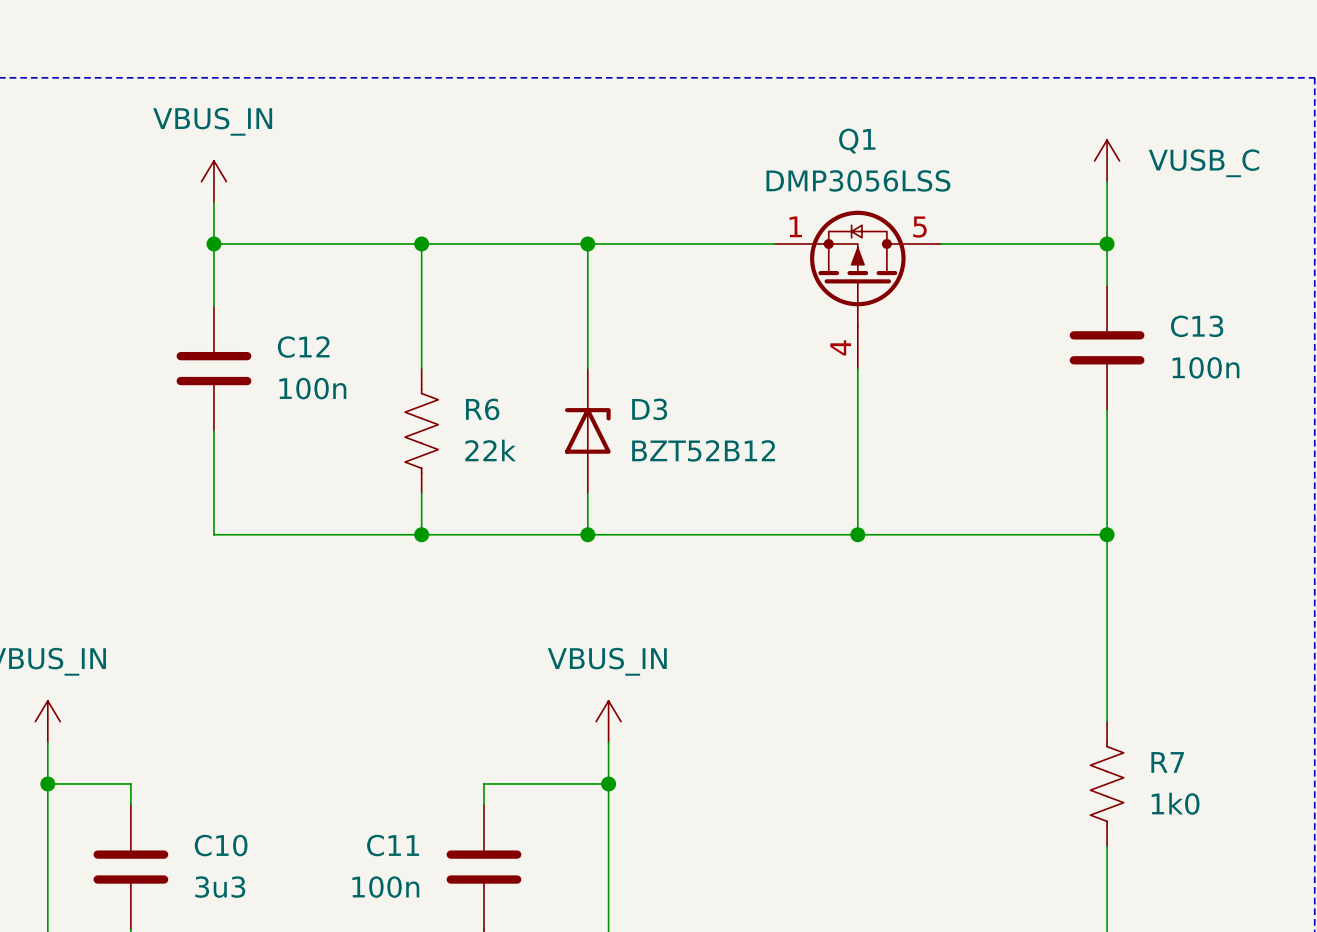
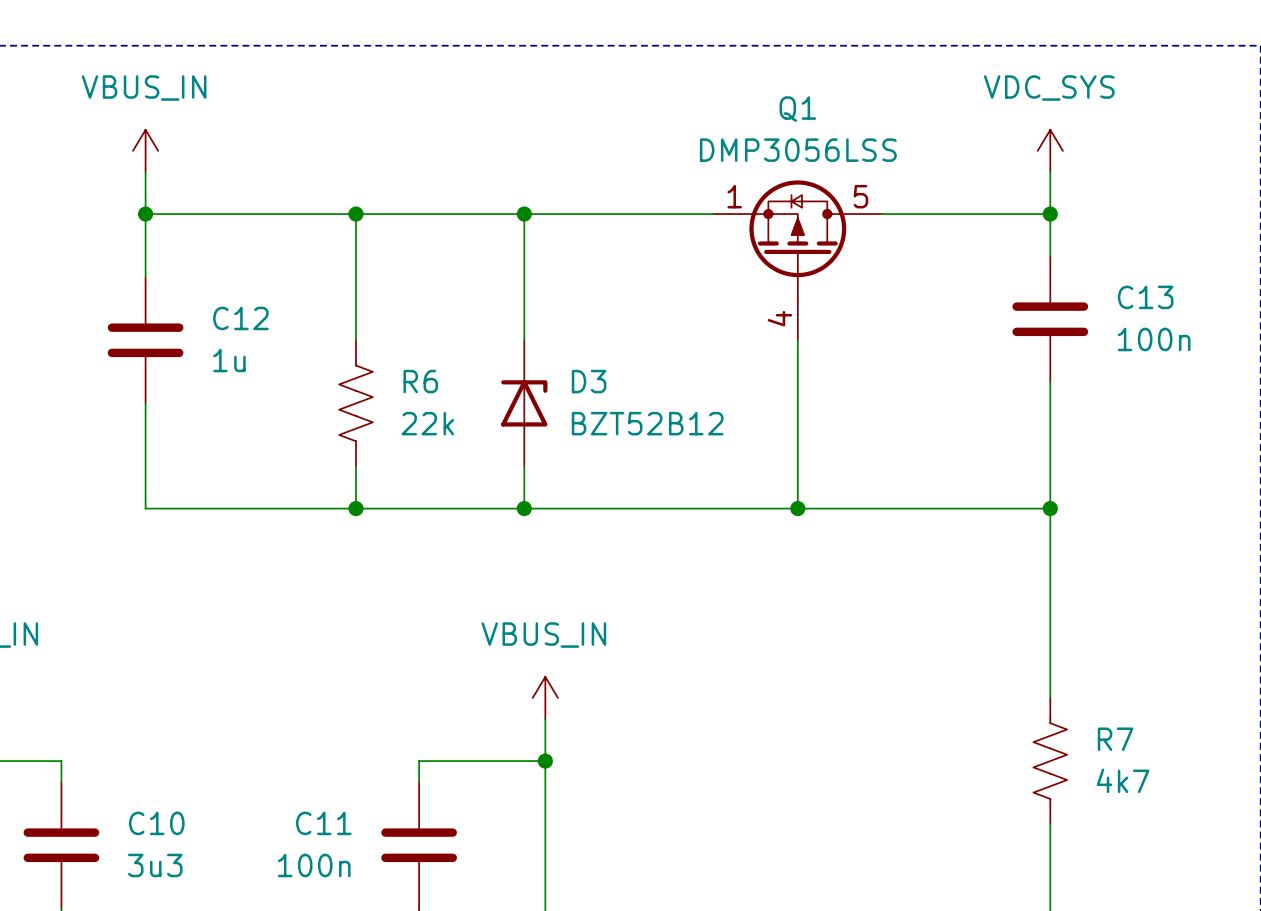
power symbol: VUSB_C (1107, 160) -> none
power symbol: none -> VDC_SYS (1050, 150)
C12 value: 100n (312, 388) -> 1u (229, 360)
R7 value: 1k0 (1175, 803) -> 4k7 (1123, 780)

